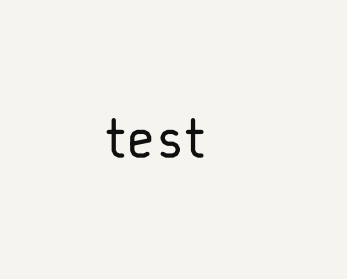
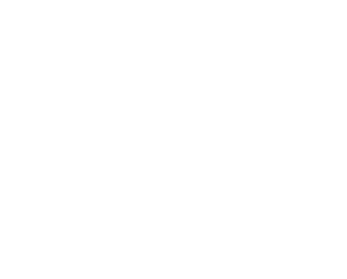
label: test (155, 137) -> none

